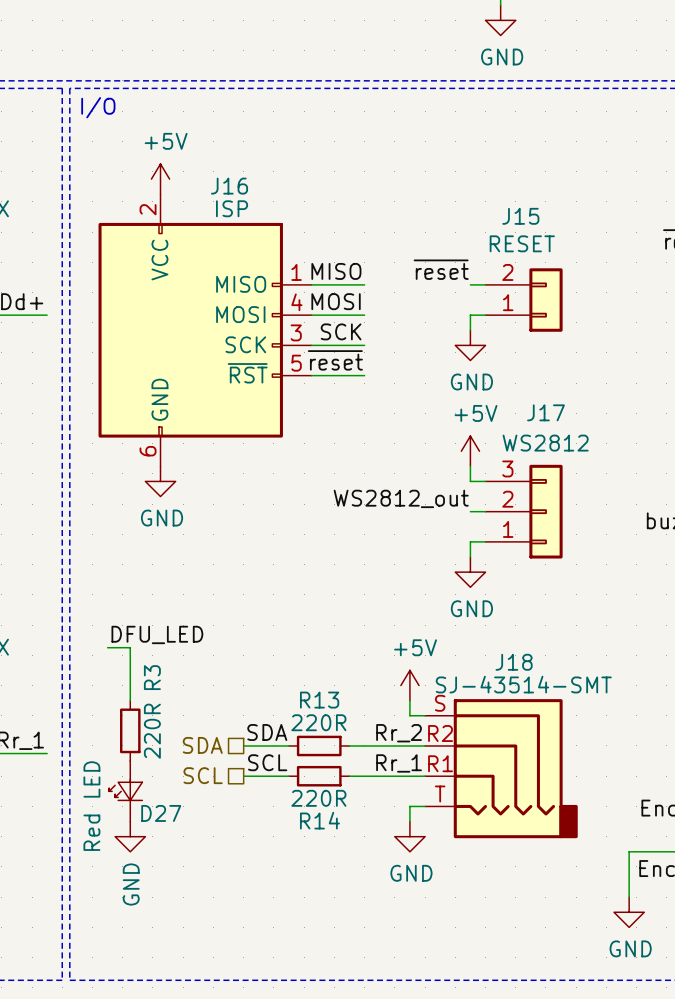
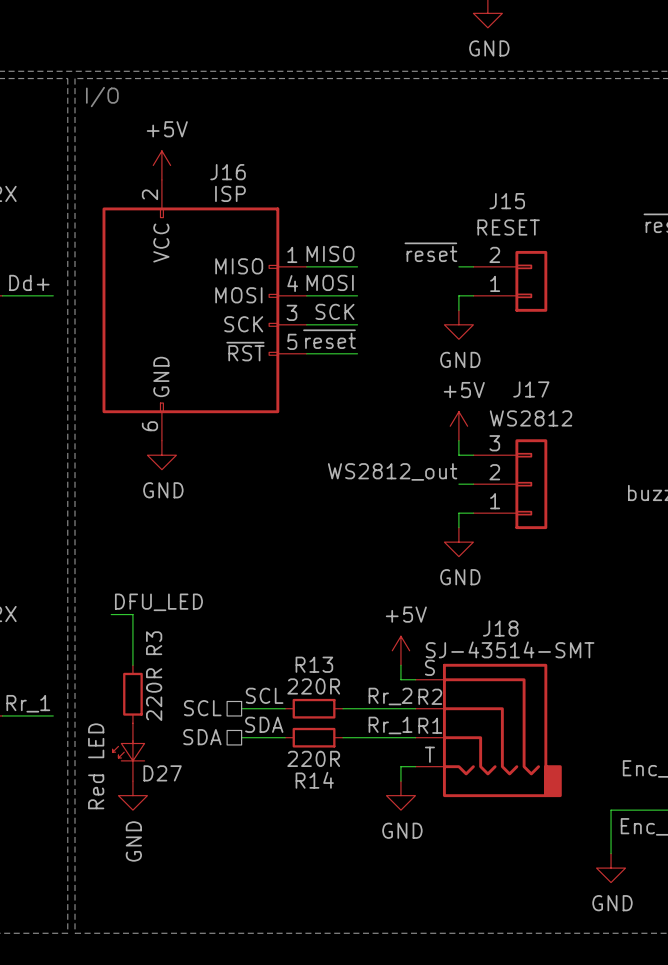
label: SDA (267, 732) -> SCL (264, 695)
hierarchical label: SDA (202, 745) -> SCL (202, 708)
label: SCL (267, 762) -> SDA (264, 724)
hierarchical label: SCL (203, 775) -> SDA (202, 737)

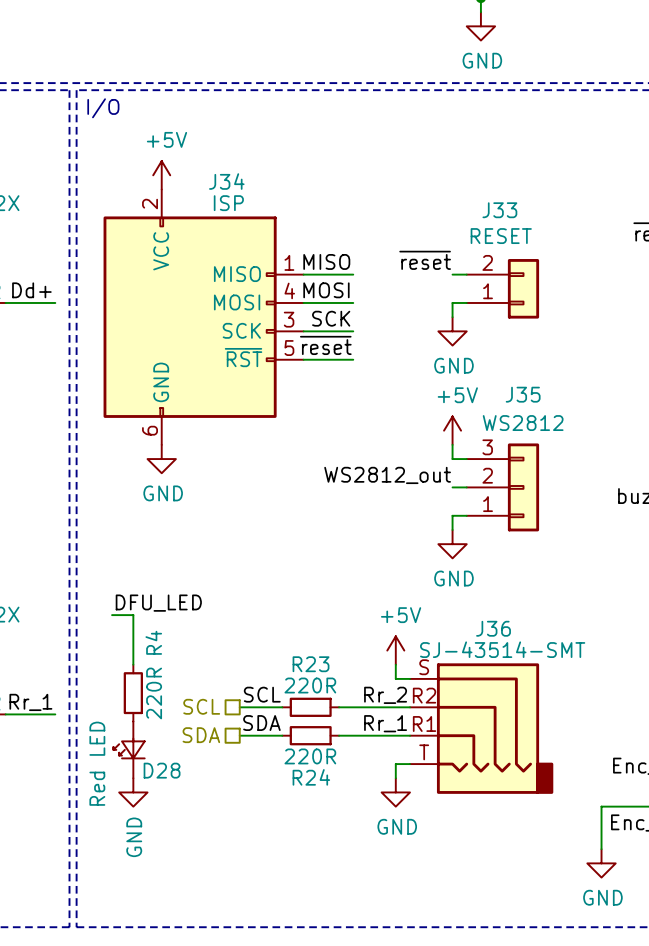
J16 name: J16 (228, 172) -> J34 (226, 181)
J15 name: J15 (507, 201) -> J33 (499, 210)
J17 name: J17 (531, 389) -> J35 (523, 394)
J18 name: J18 (500, 628) -> J36 (493, 628)
R3 name: R3 (154, 643) -> R4 (153, 642)
R13 name: R13 (314, 664) -> R23 (311, 664)
D27 name: D27 (162, 773) -> D28 (162, 770)
R14 name: R14 (314, 780) -> R24 (311, 777)

